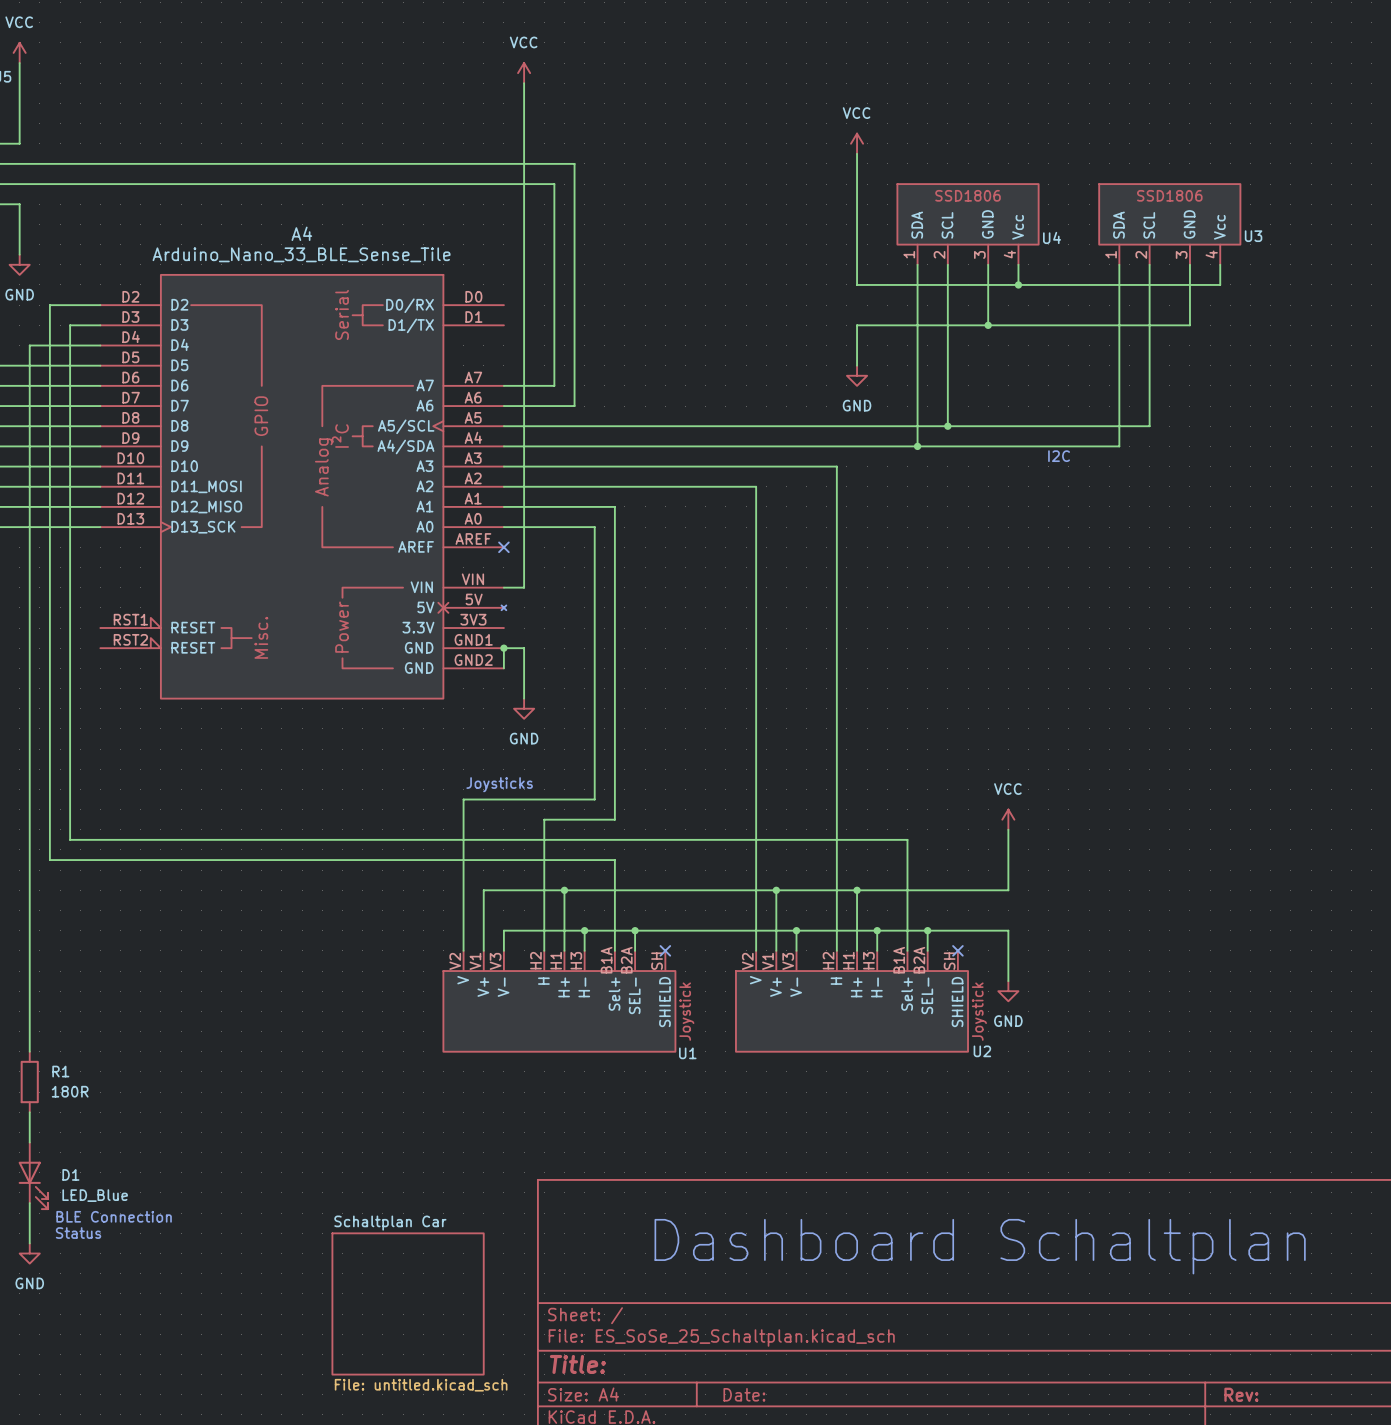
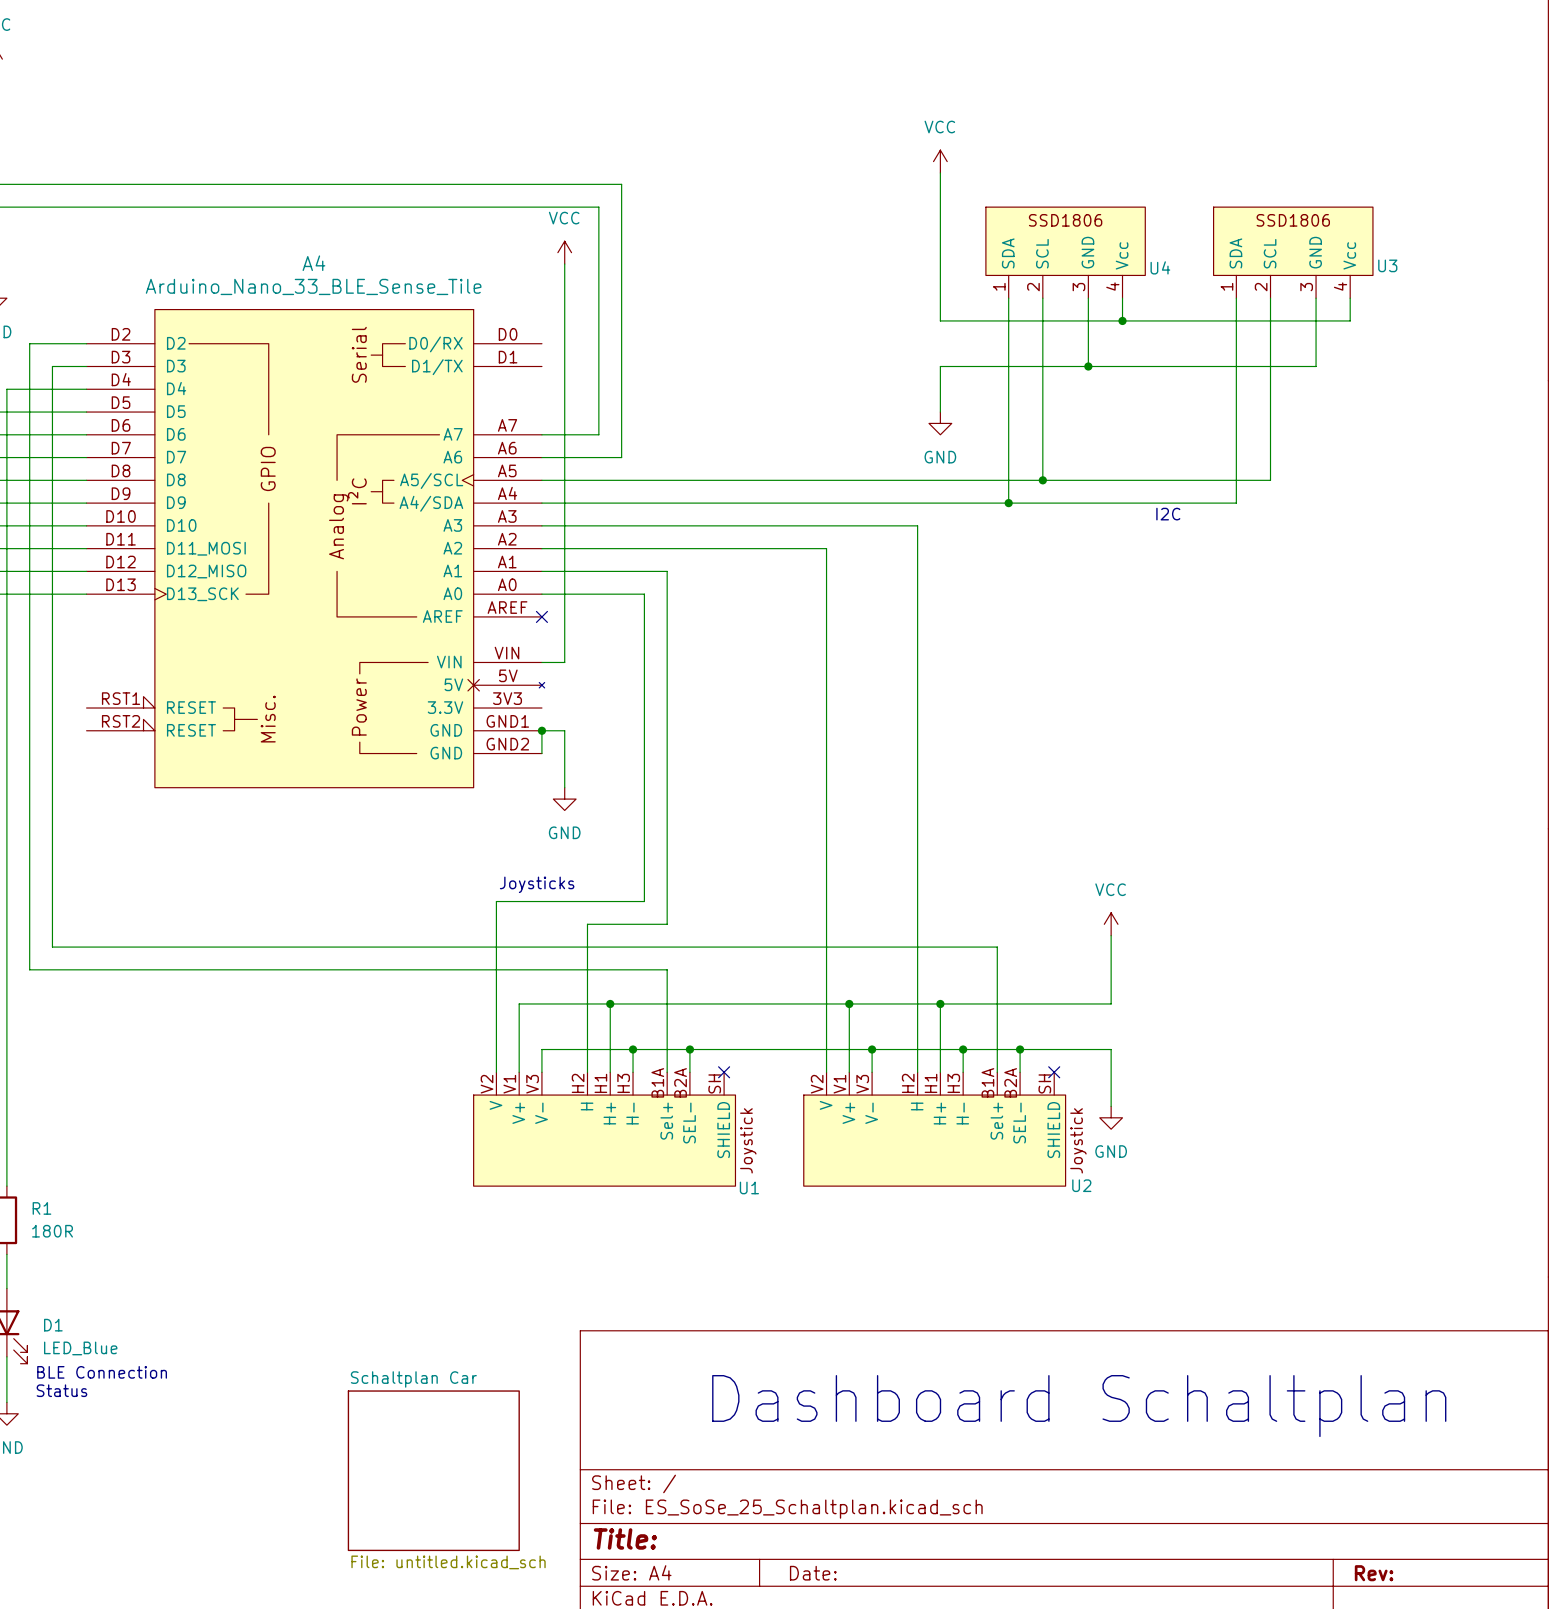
power symbol position: VCC (524, 73) -> VCC (564, 252)
wire: (524, 83) (524, 234) -> none

